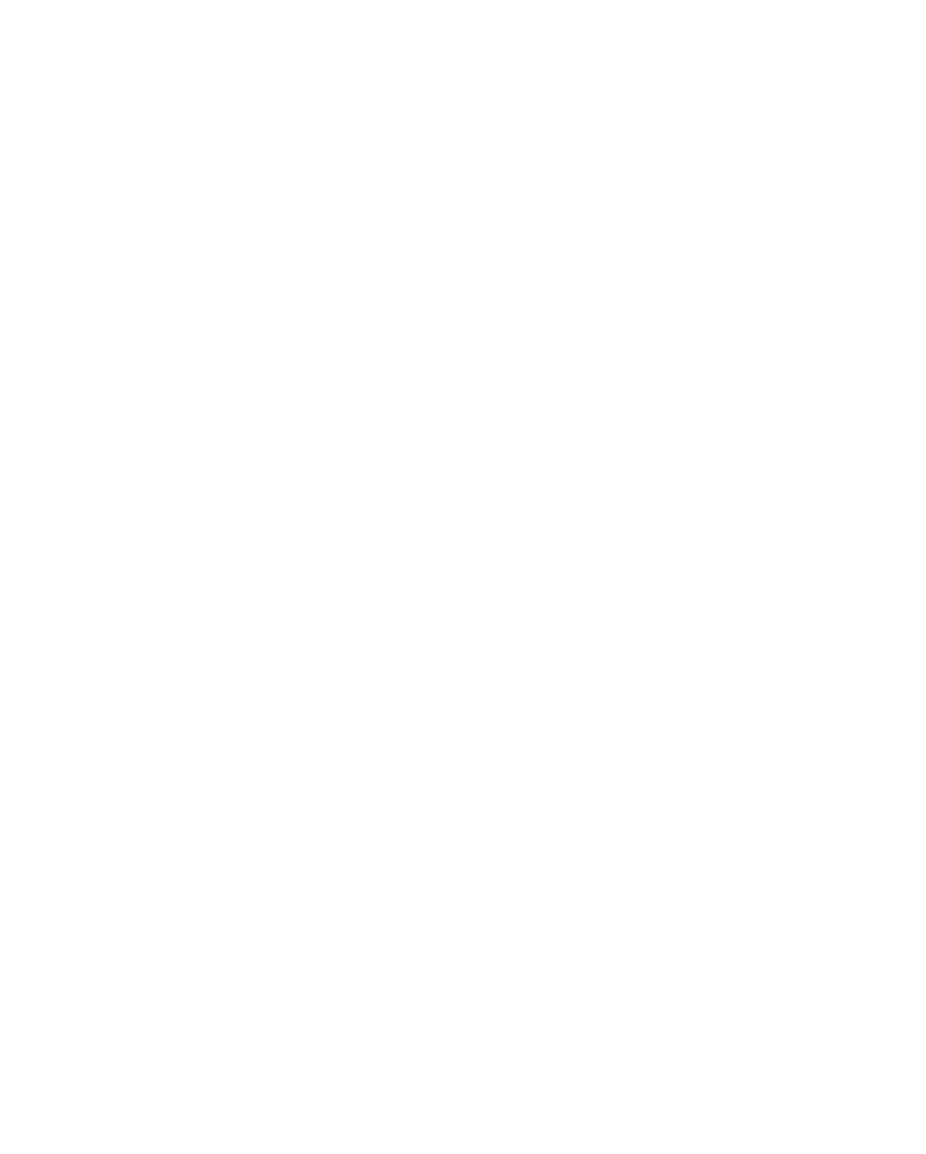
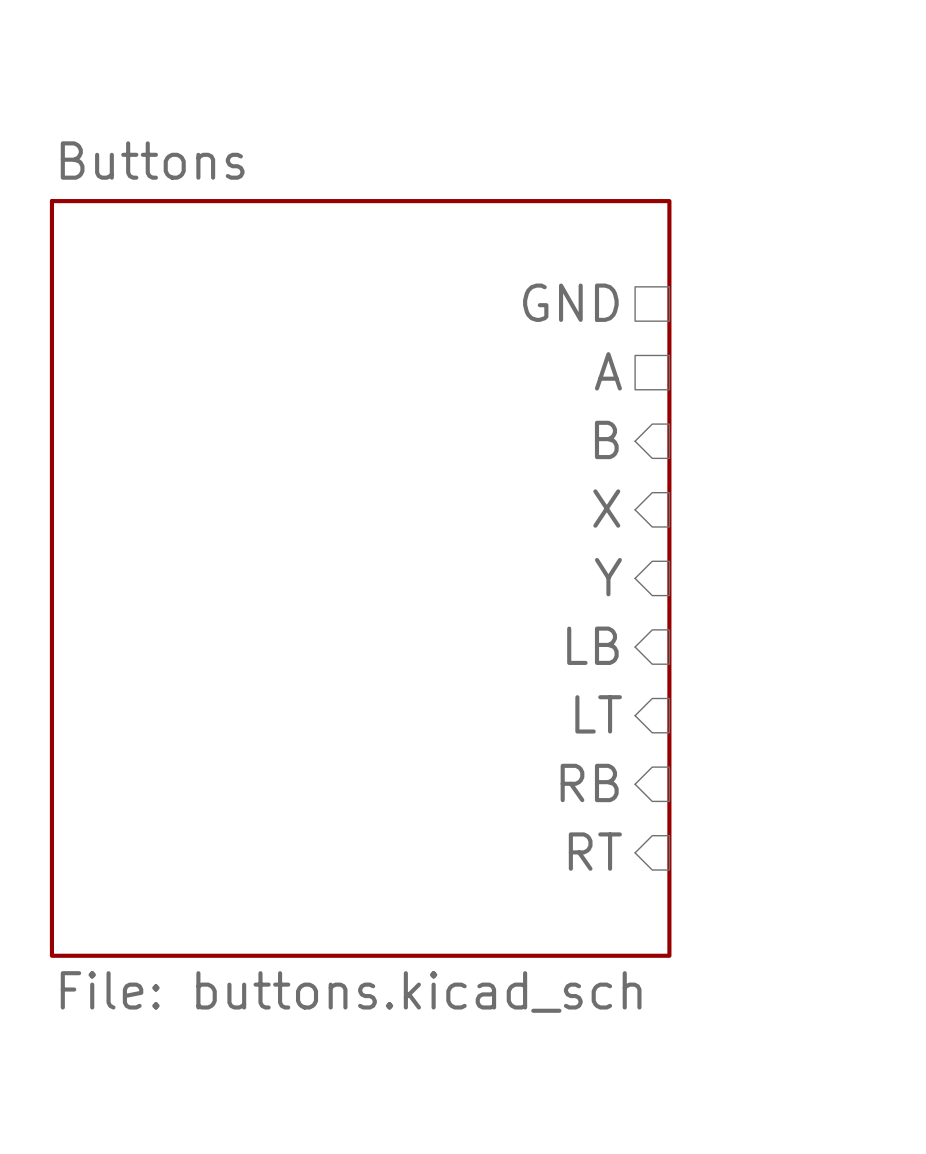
sheet pin: none -> GND (570, 302)
sheet pin: none -> A (608, 371)
sheet pin: none -> B (606, 439)
sheet pin: none -> X (606, 508)
sheet pin: none -> Y (608, 577)
sheet Buttons: none -> File: buttons.kicad_sch (360, 578)
sheet pin: none -> LB (592, 645)
sheet pin: none -> LT (598, 714)
sheet pin: none -> RB (589, 782)
sheet pin: none -> RT (595, 851)

